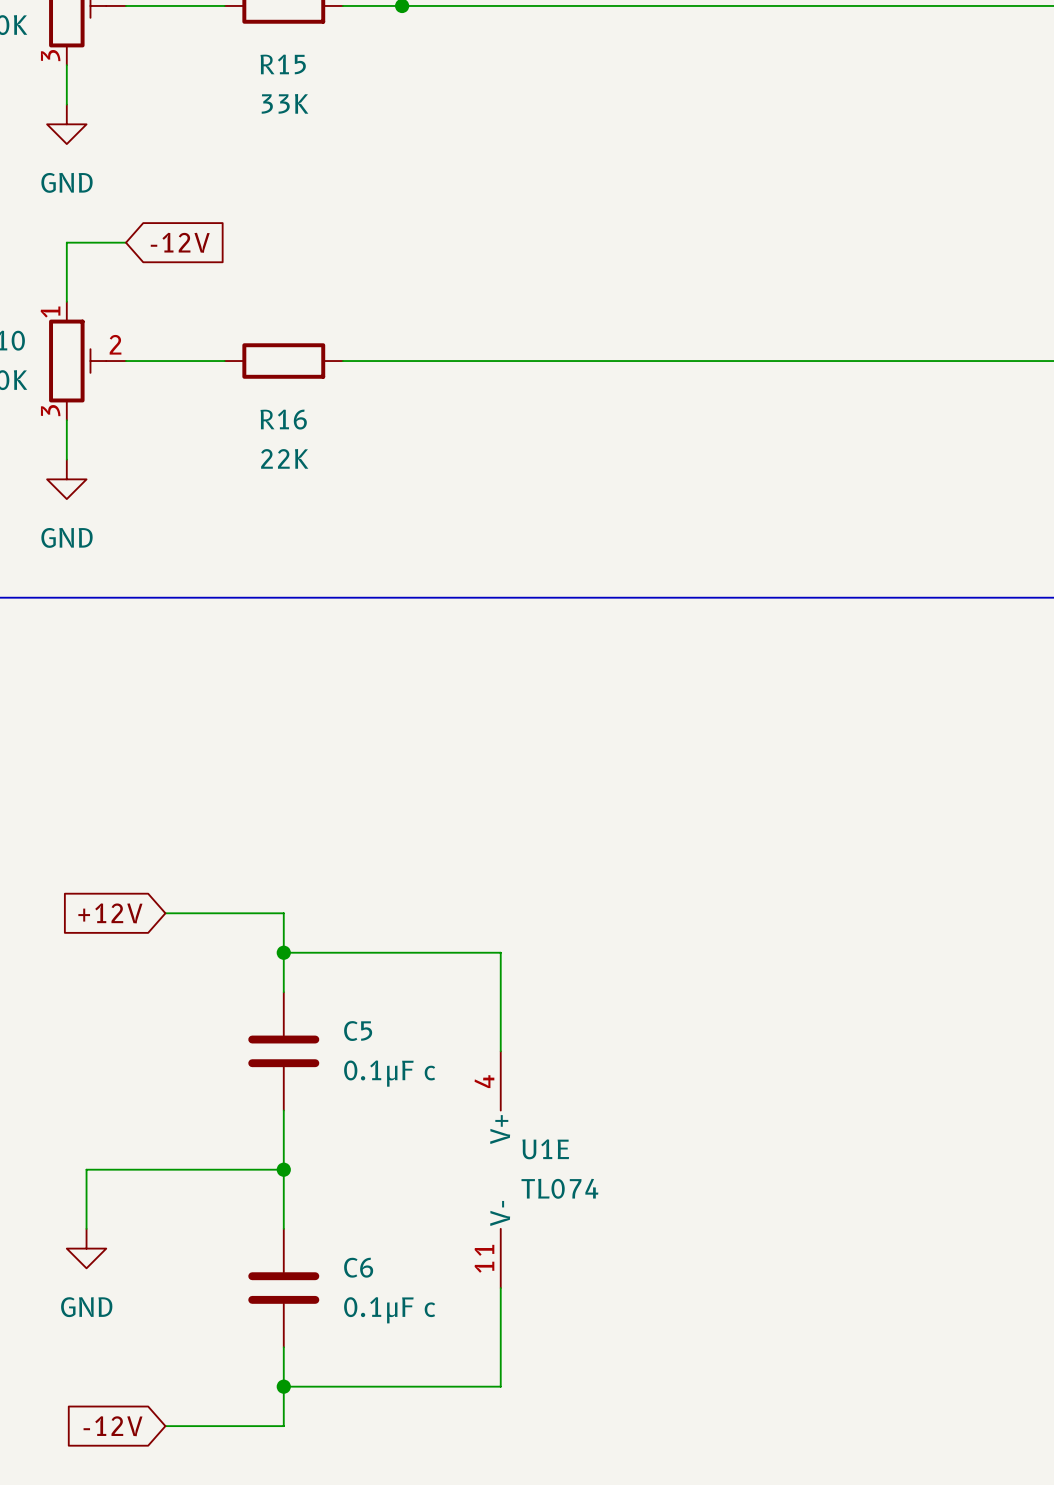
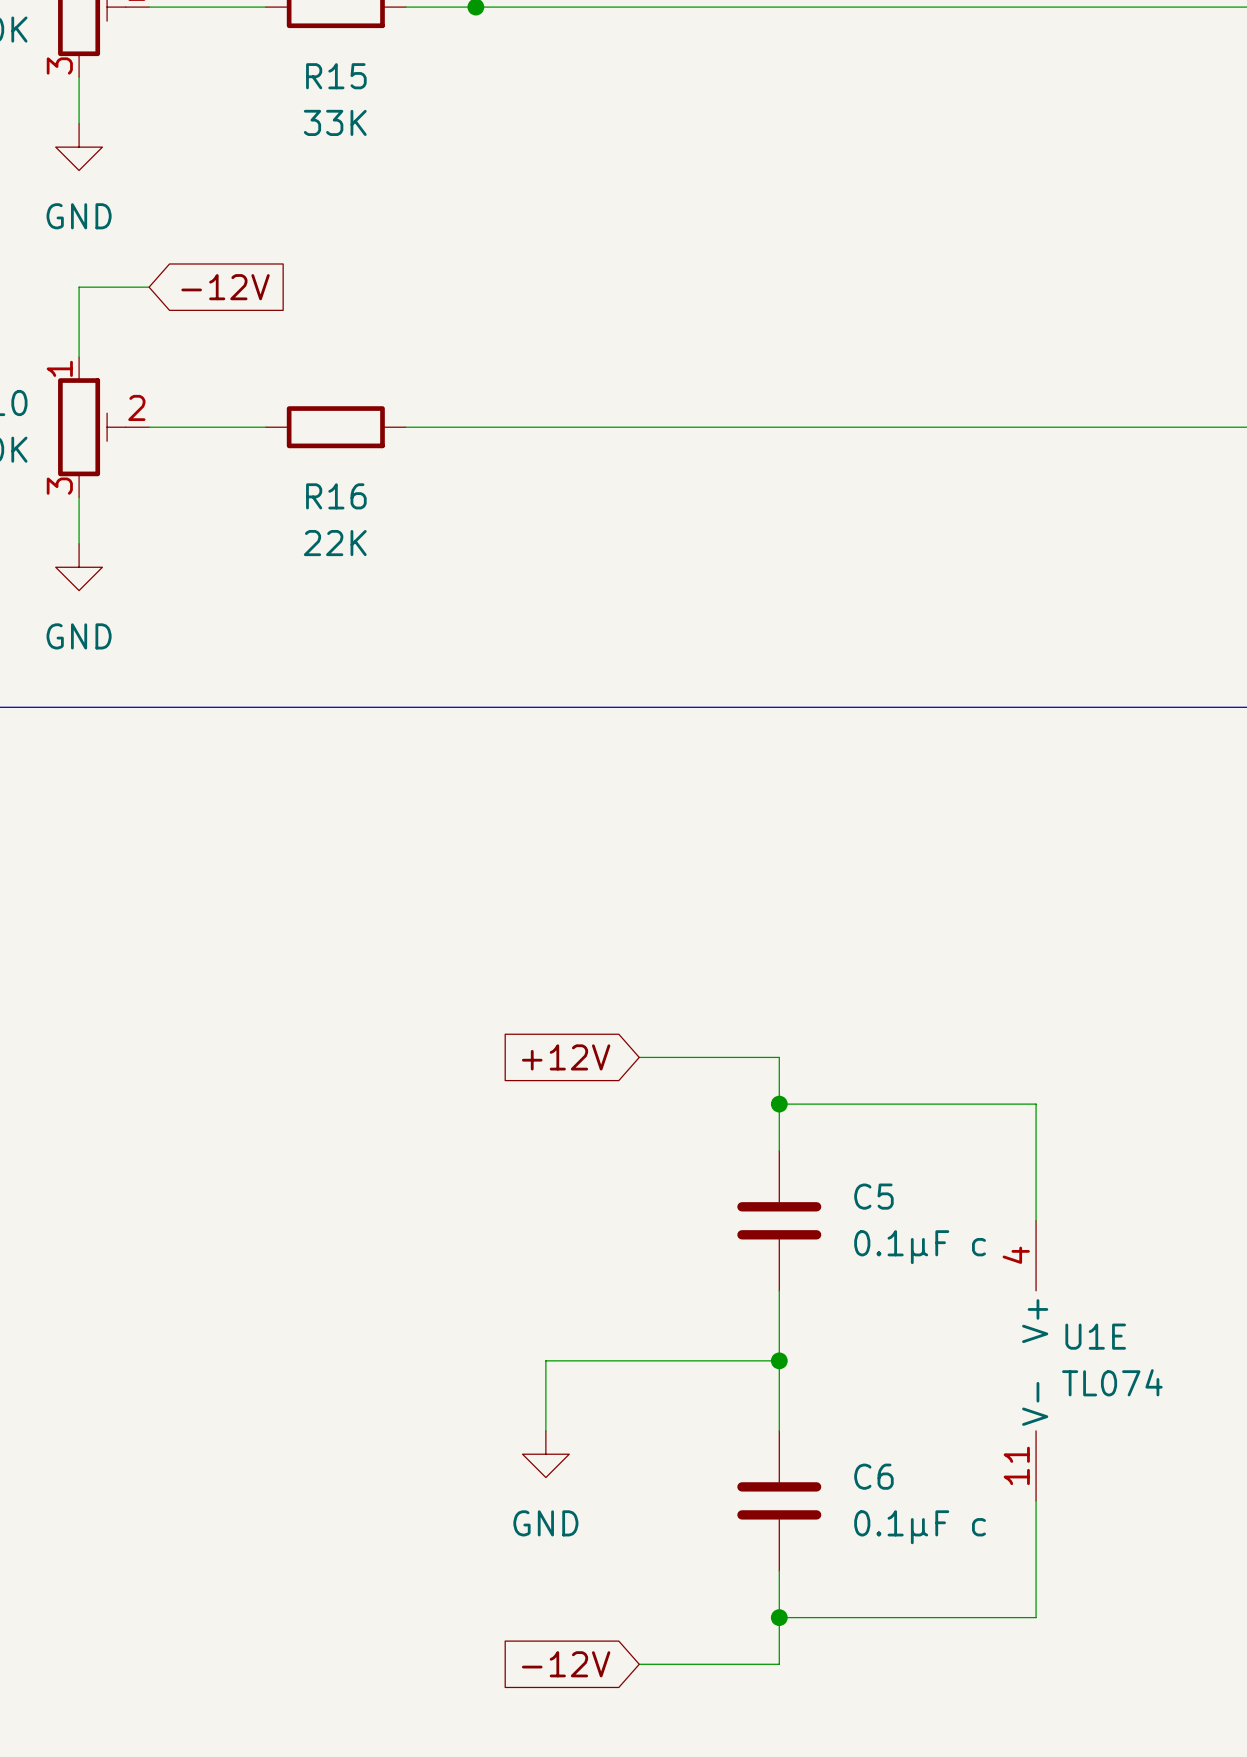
global label position: +12V (110, 913) -> +12V (566, 1057)
wire: (165, 913) (283, 913) (283, 992) -> (639, 1057) (779, 1057) (779, 1150)
junction: none -> (779, 1104)
wire: (283, 952) (500, 952) (500, 1051) -> (779, 1104) (1036, 1104) (1036, 1220)
junction: (283, 952) -> none
C5 position: (283, 1051) -> (779, 1220)
wire: (283, 1110) (283, 1228) -> (779, 1290) (779, 1430)
junction: none -> (779, 1360)
wire: (283, 1169) (86, 1169) (86, 1228) -> (779, 1360) (545, 1360) (545, 1430)
junction: (283, 1169) -> none
U1E position: (500, 1169) -> (1036, 1360)
power symbol position: GND (86, 1248) -> GND (545, 1454)
C6 position: (283, 1288) -> (779, 1500)
wire: (500, 1288) (500, 1386) (283, 1386) -> (1036, 1500) (1036, 1617) (779, 1617)
wire: (283, 1347) (283, 1426) (165, 1426) -> (779, 1570) (779, 1664) (639, 1664)
junction: none -> (779, 1617)
junction: (283, 1386) -> none
global label position: -12V (113, 1426) -> -12V (566, 1664)

